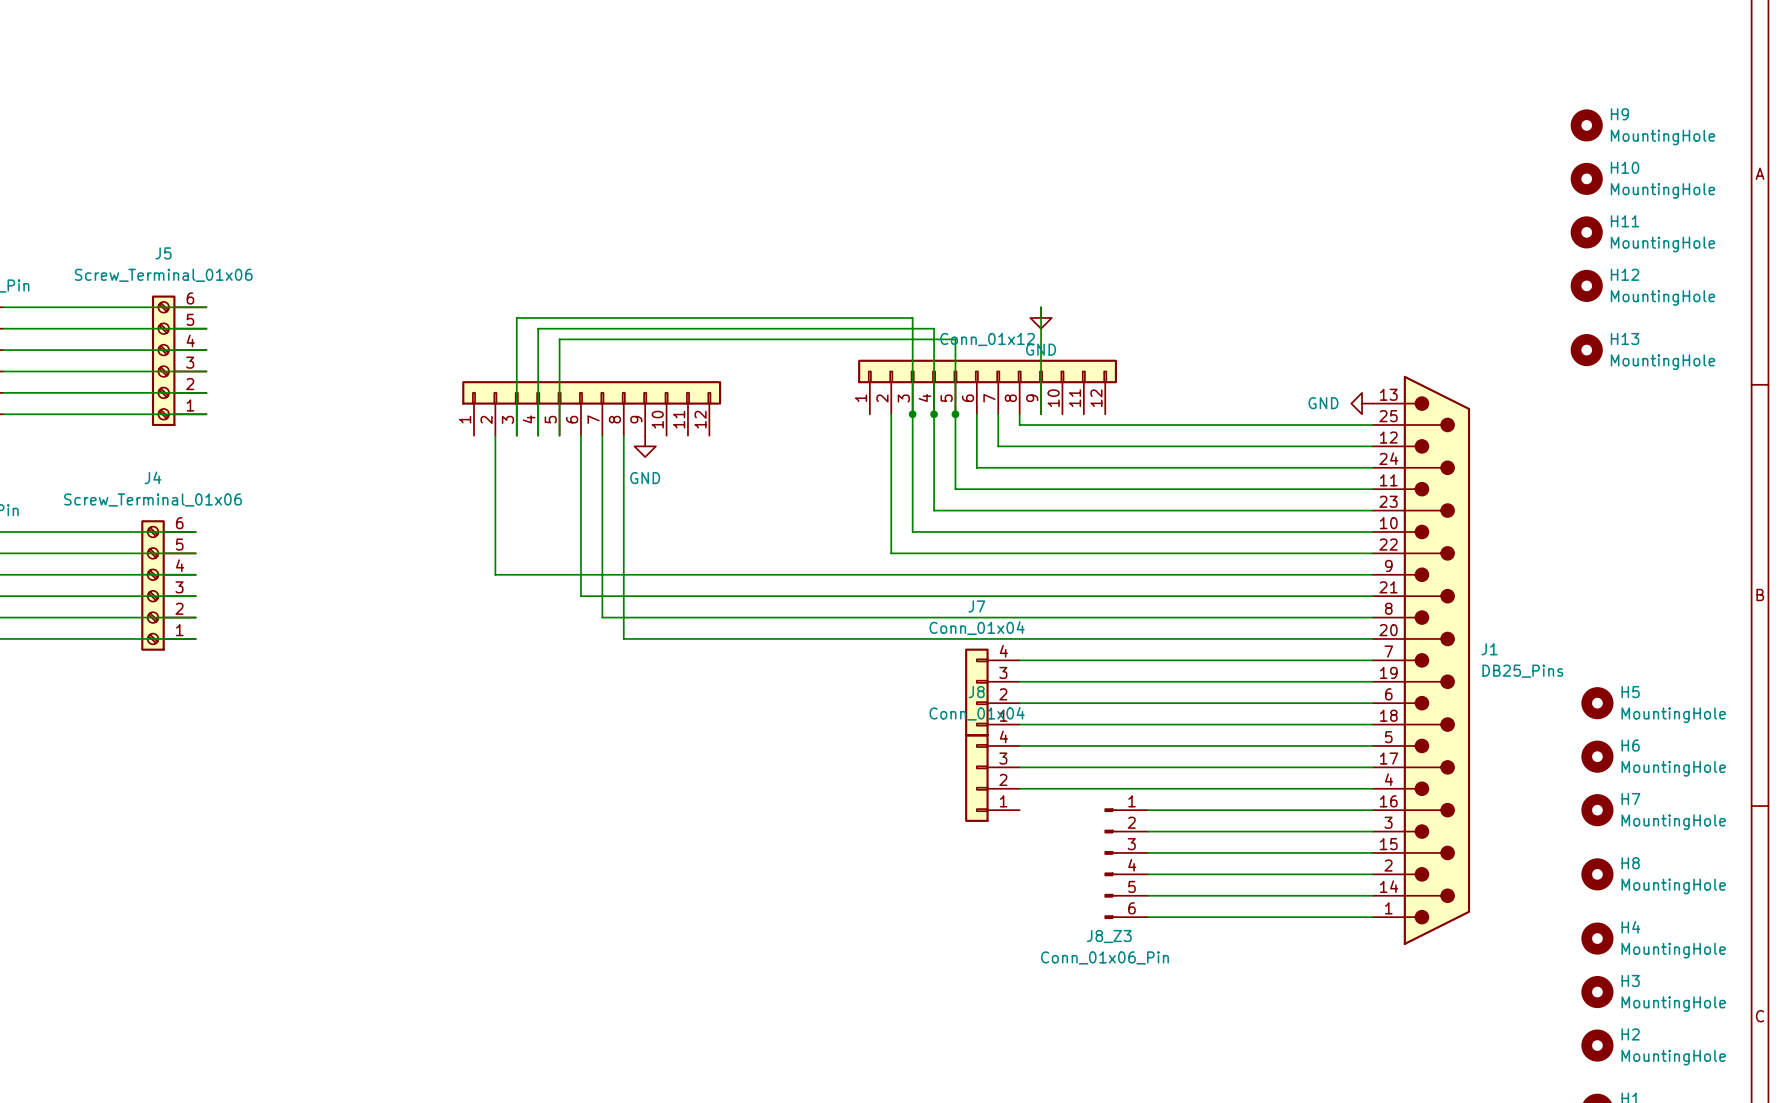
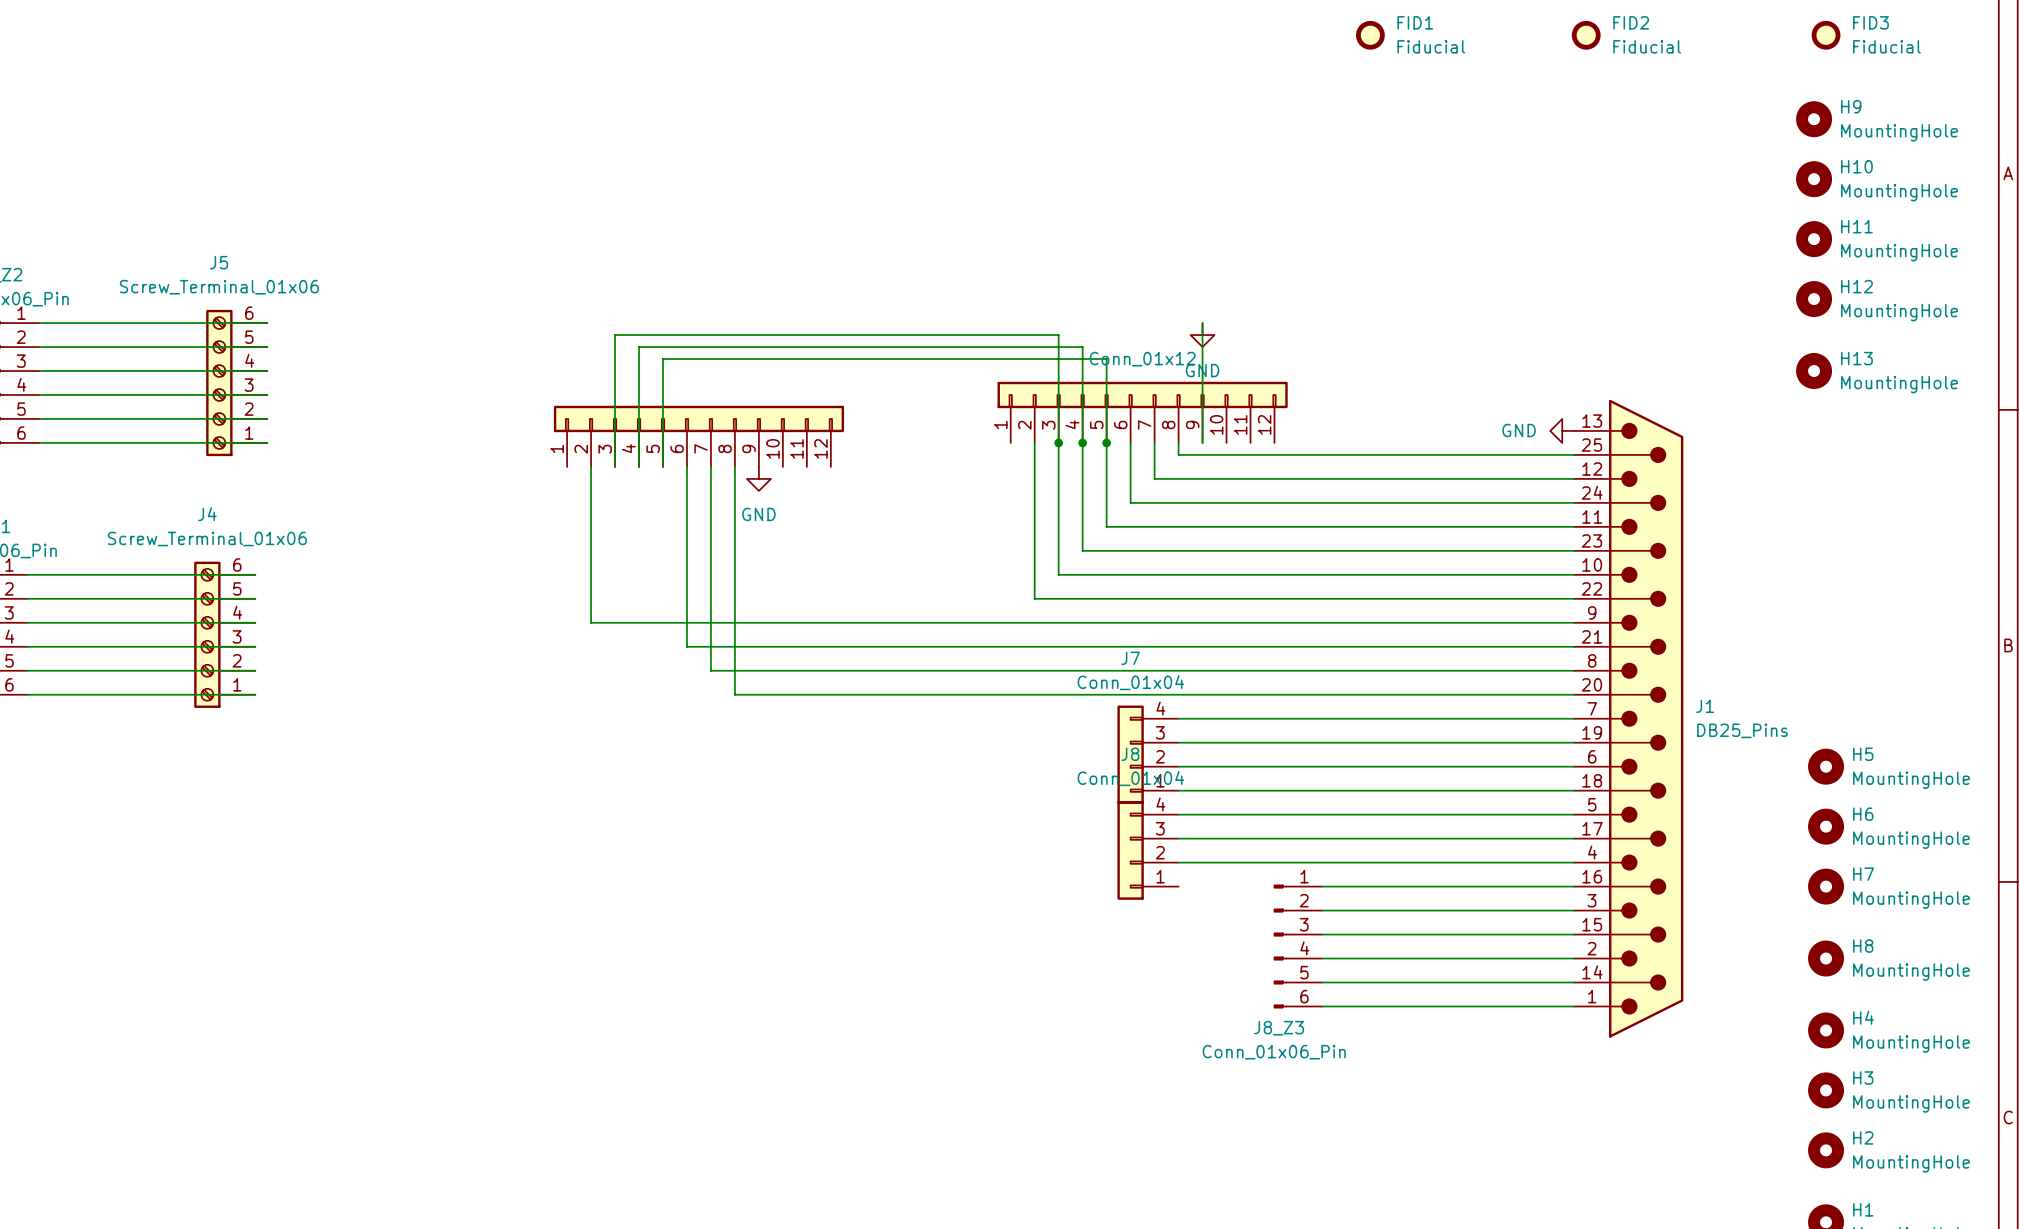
FID1: none -> Fiducial (1370, 35)
FID2: none -> Fiducial (1586, 35)
FID3: none -> Fiducial (1826, 35)

